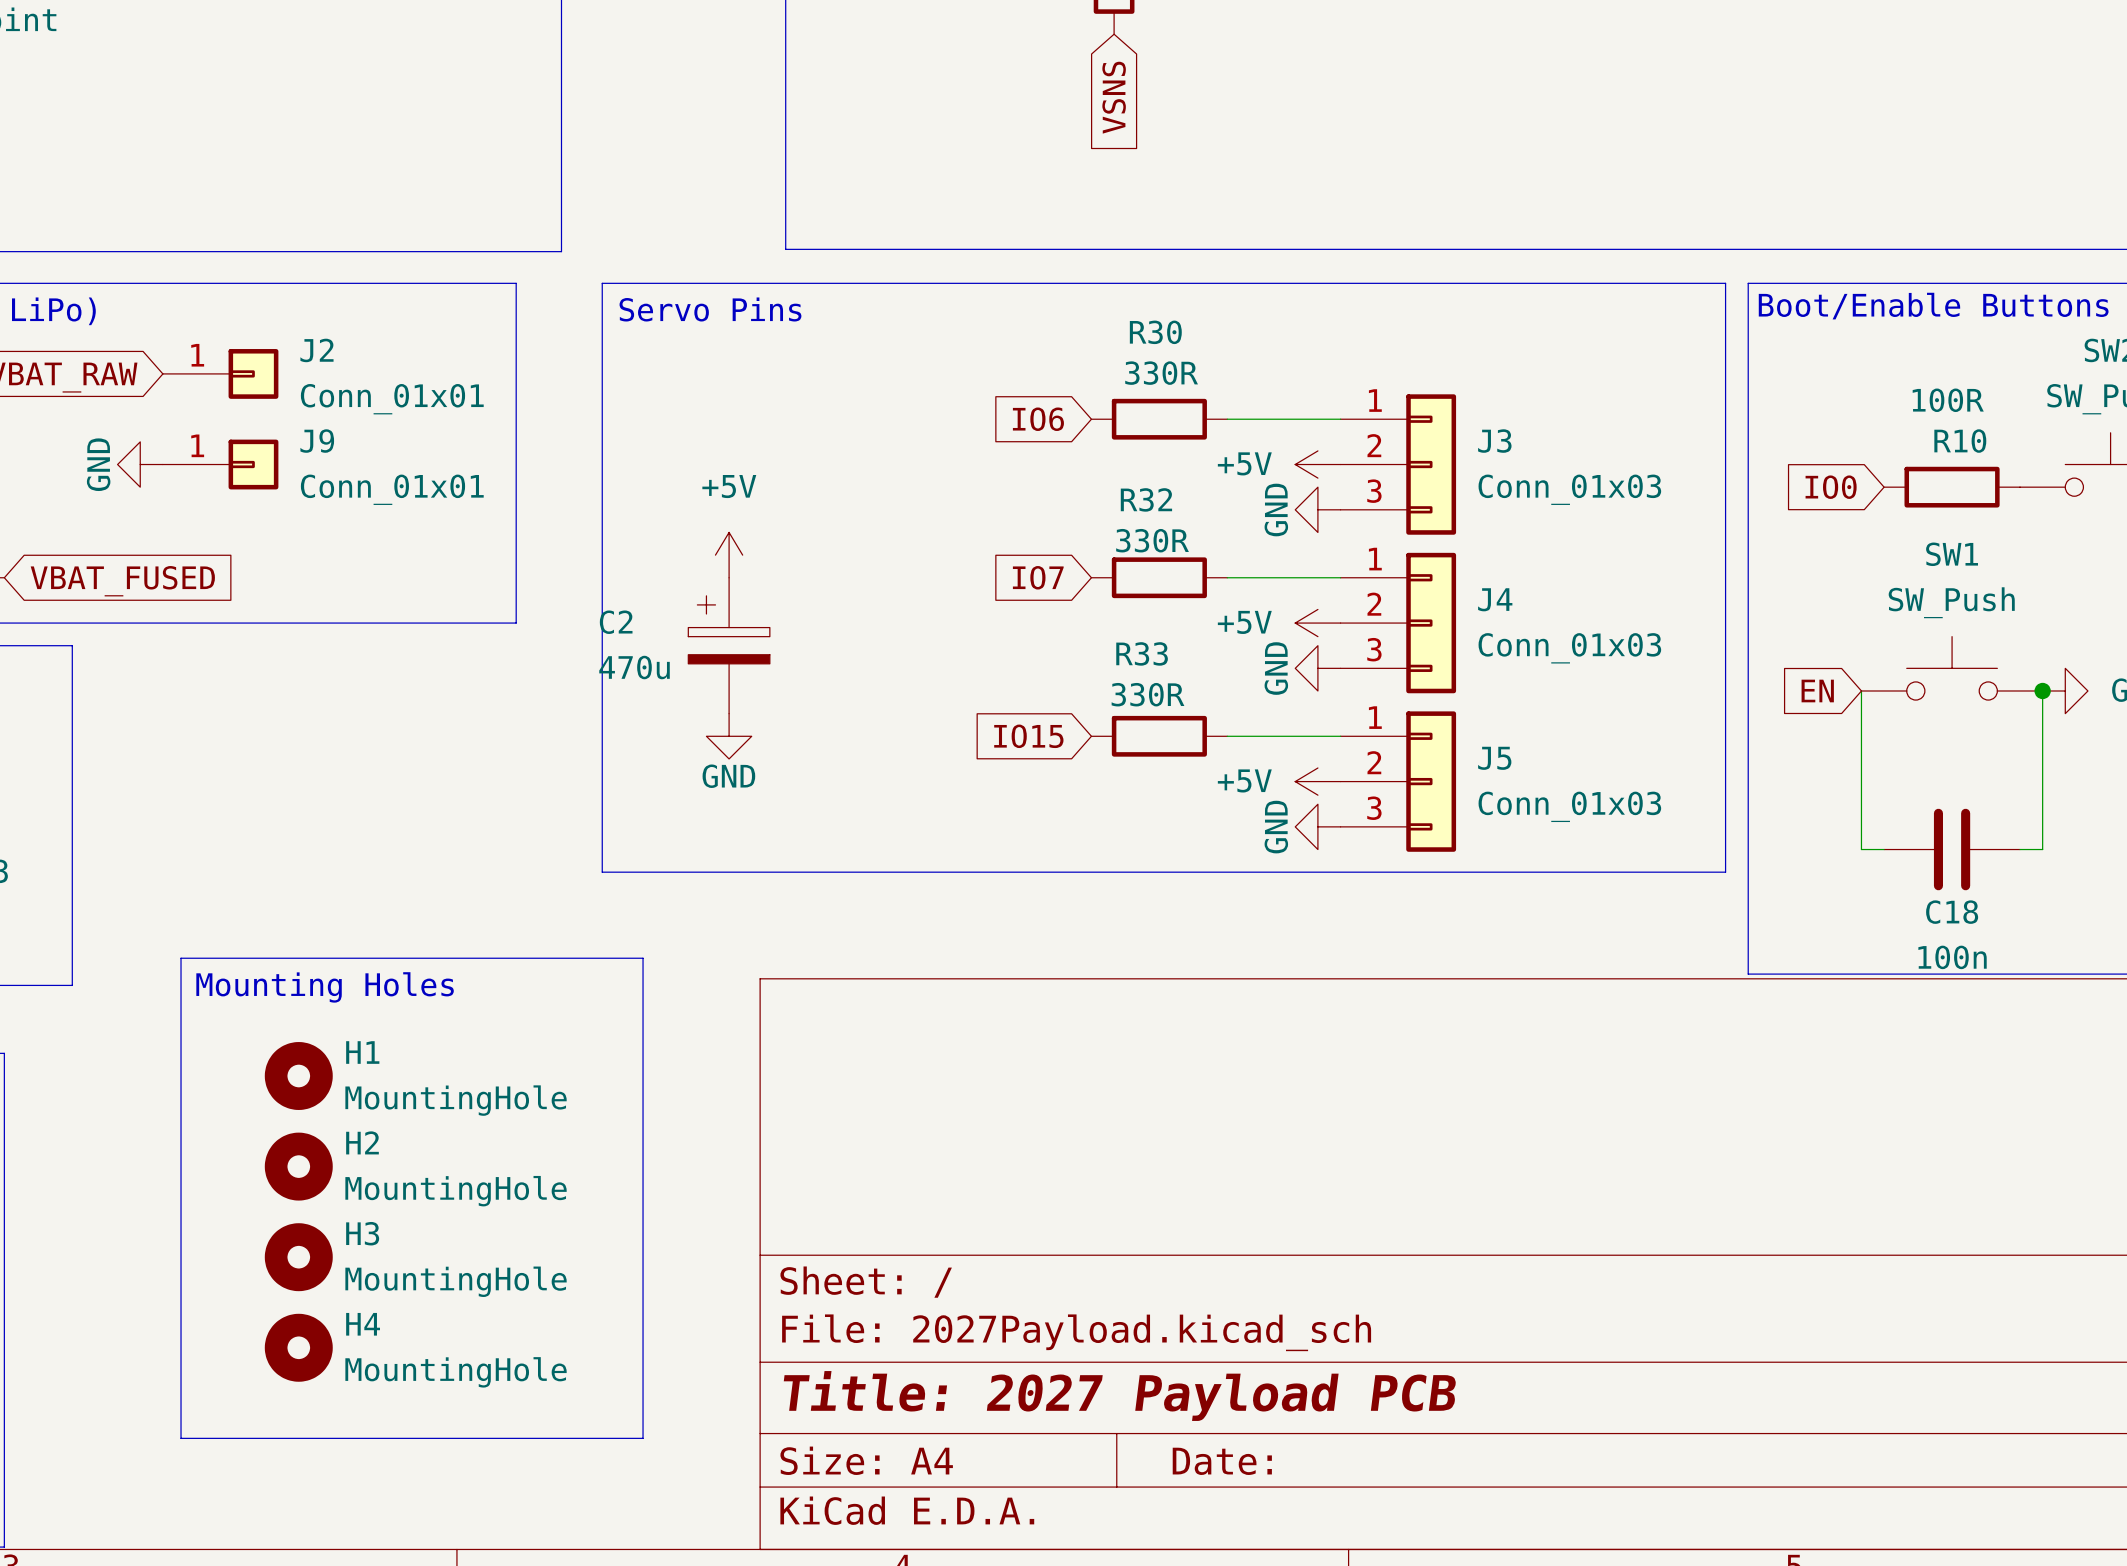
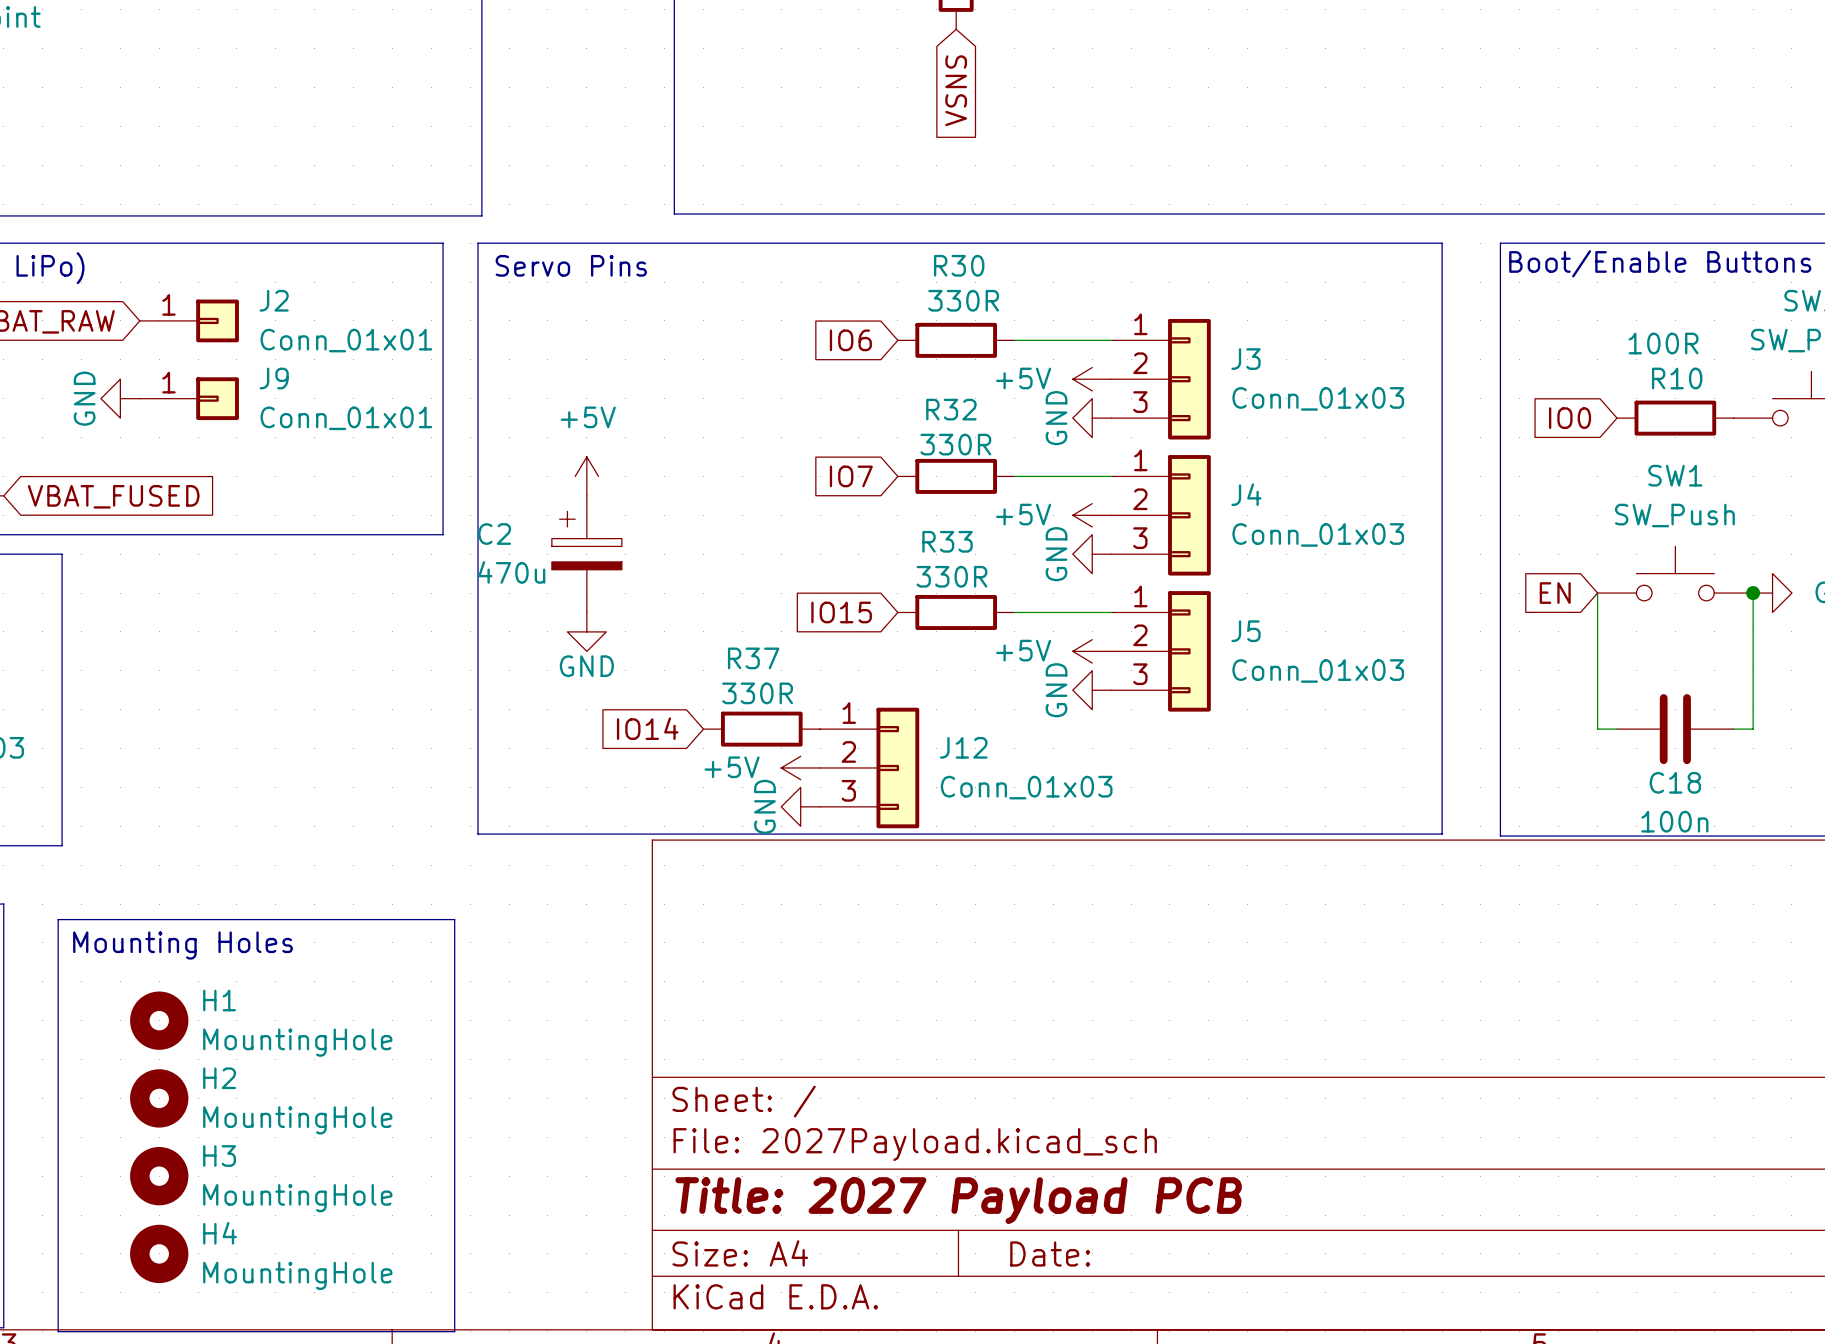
line: (602, 283) (602, 872) (1725, 872) (1725, 283) (1680, 283) -> (516, 243) (478, 243) (478, 834) (1442, 834) (1442, 243)
text position: Servo Pins (710, 309) -> Servo Pins (571, 265)
global label position: IO6 (1038, 419) -> IO6 (850, 340)
R30 position: (1159, 419) -> (956, 340)
wire: (1227, 419) (1340, 419) -> (1014, 340) (1111, 340)
power symbol position: +5V (1317, 464) -> +5V (1092, 379)
J3 position: (1398, 464) -> (1161, 379)
power symbol position: GND (1317, 509) -> GND (1092, 418)
power symbol position: +5V (729, 555) -> +5V (586, 476)
global label position: IO7 (1038, 577) -> IO7 (851, 476)
R32 position: (1159, 577) -> (956, 476)
wire: (1227, 577) (1340, 577) -> (1014, 476) (1111, 476)
power symbol position: +5V (1317, 623) -> +5V (1092, 515)
J4 position: (1398, 623) -> (1161, 515)
C2 position: (729, 645) -> (586, 554)
power symbol position: GND (1317, 668) -> GND (1092, 554)
power symbol position: GND (729, 736) -> GND (586, 631)
global label position: IO15 (1028, 736) -> IO15 (841, 612)
R33 position: (1159, 736) -> (956, 612)
wire: (1227, 736) (1340, 736) -> (1014, 612) (1111, 612)
power symbol position: +5V (1317, 781) -> +5V (1092, 651)
J5 position: (1398, 781) -> (1161, 651)
power symbol position: GND (1317, 826) -> GND (1092, 690)
global label: none -> IO14 (647, 728)
R37: none -> 330R (761, 729)
power symbol: none -> +5V (800, 767)
J12: none -> Conn_01x03 (869, 767)
power symbol: none -> GND (800, 806)
line: (181, 958) (643, 958) (643, 1438) (181, 1438) (181, 958) -> (58, 919) (454, 919) (454, 1331) (58, 1331) (58, 919)
text position: Mounting Holes (325, 987) -> Mounting Holes (183, 945)
H1 position: (298, 1076) -> (159, 1020)
H2 position: (298, 1166) -> (159, 1098)
H3 position: (298, 1257) -> (159, 1176)
H4 position: (298, 1347) -> (159, 1253)

